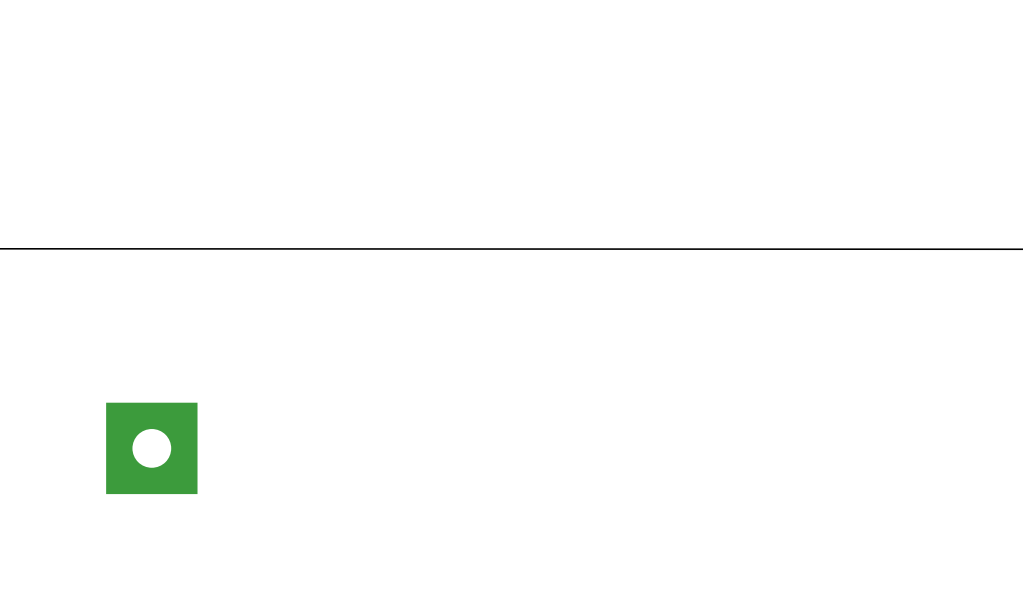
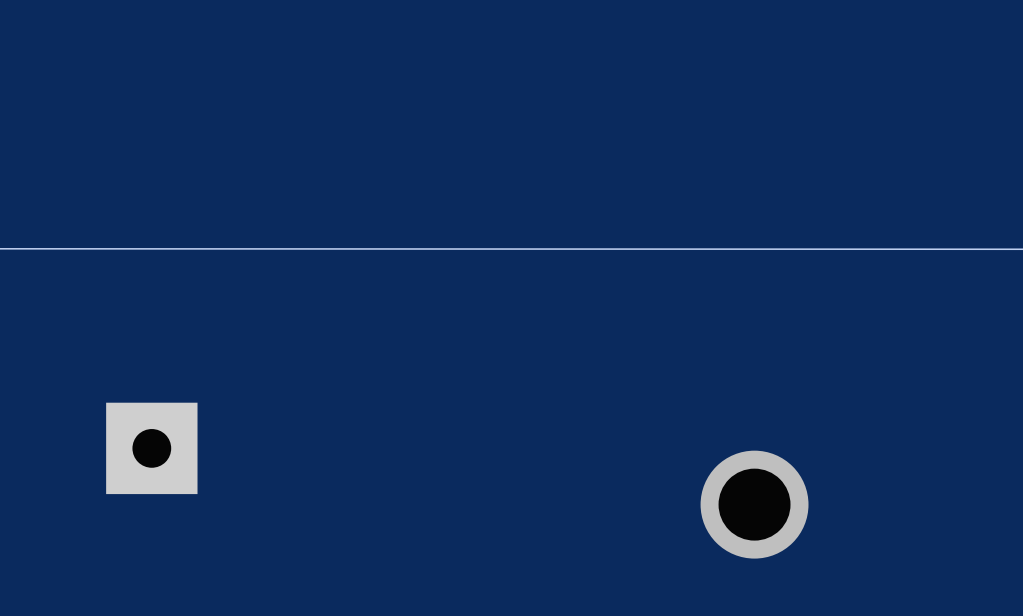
via: none -> (754, 504)

